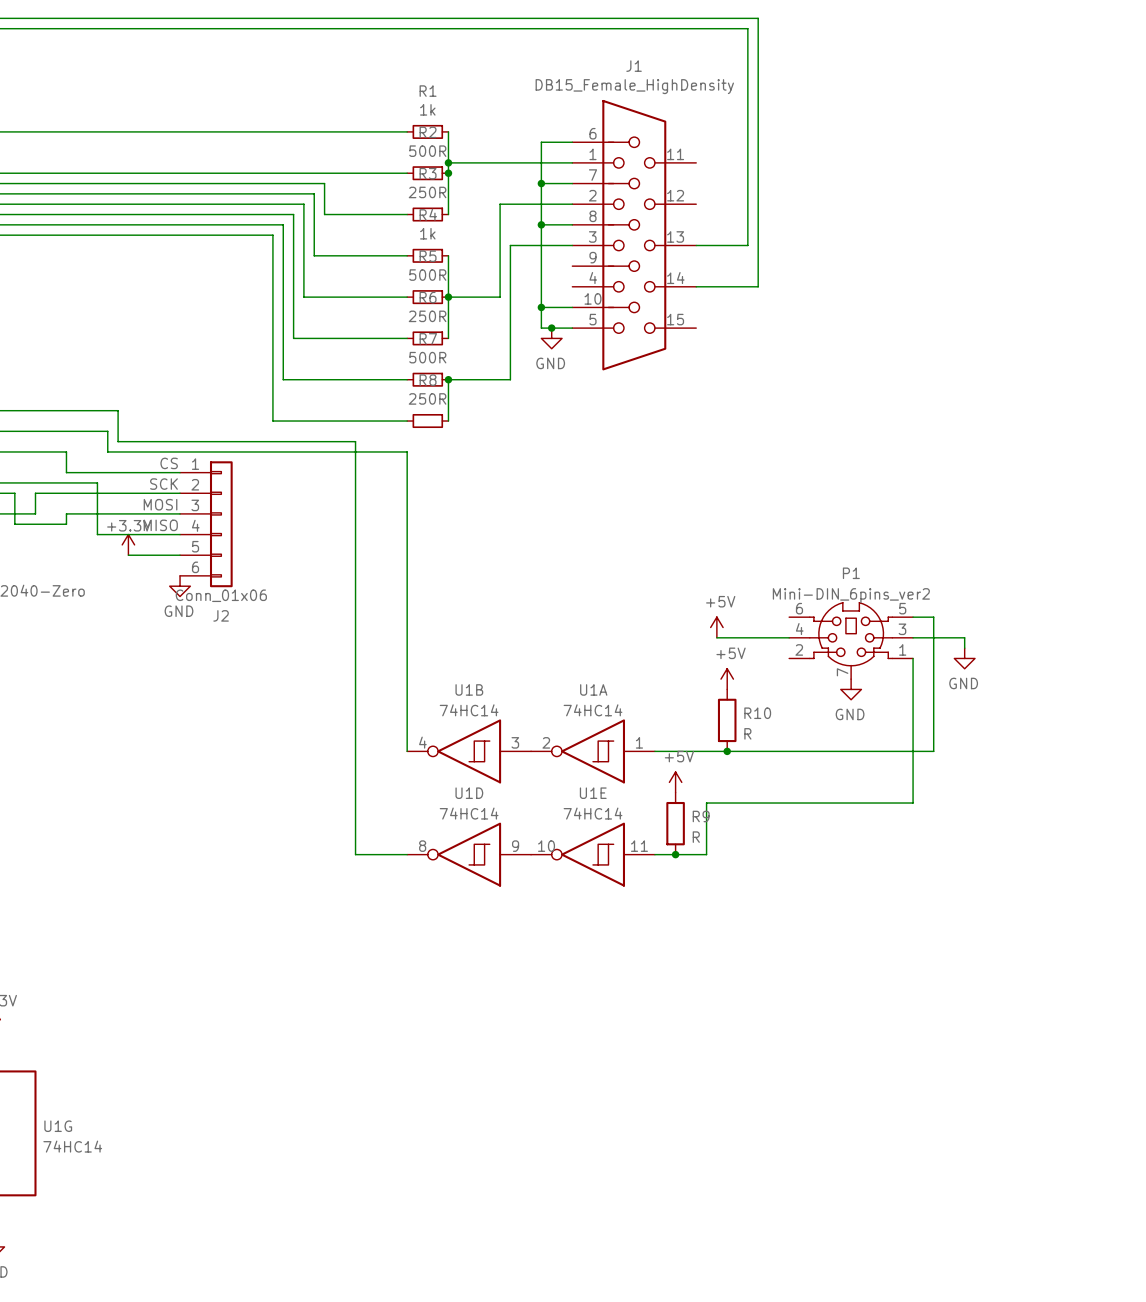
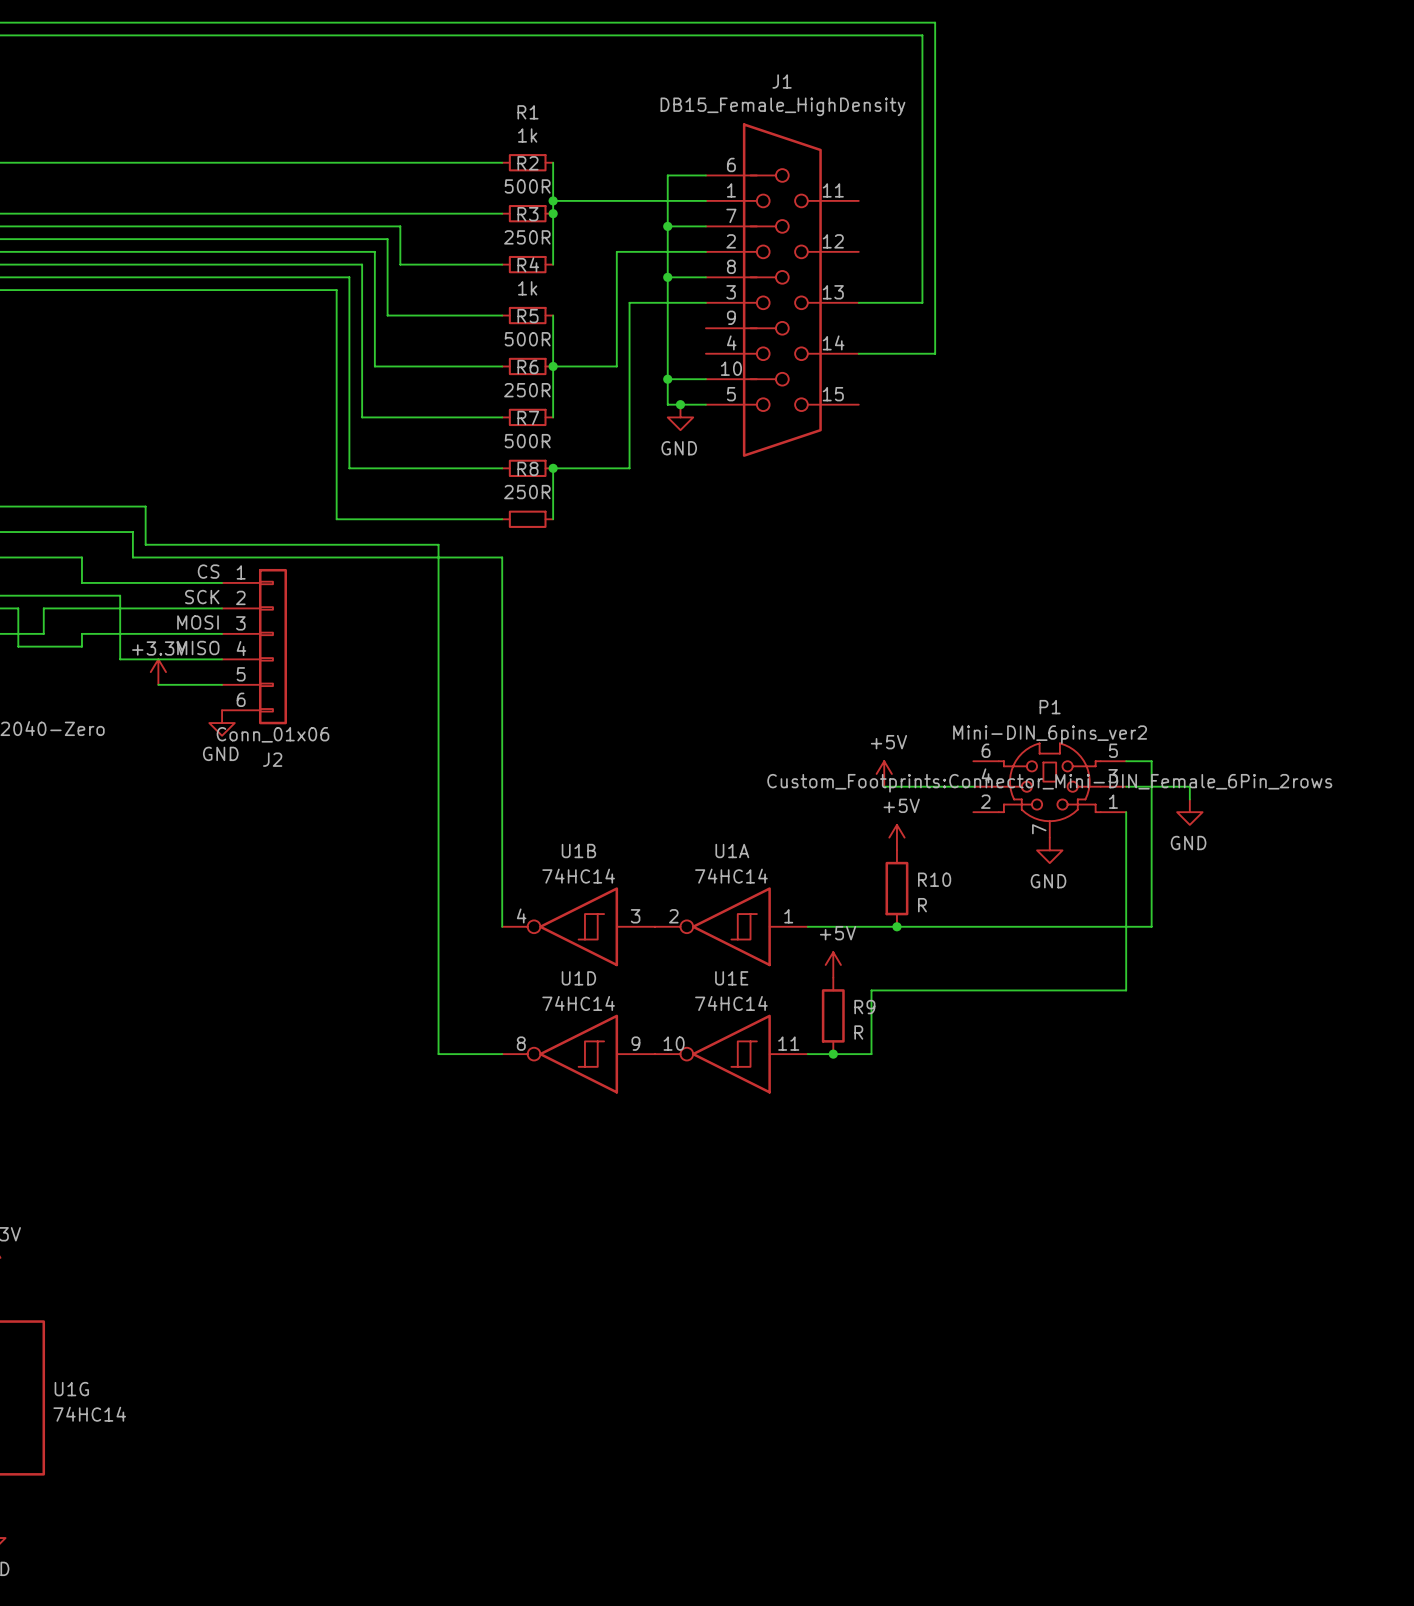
P1 text: none -> Custom_Footprints:Connector_Mini-DIN_Female_6Pin_2rows (1049, 783)

